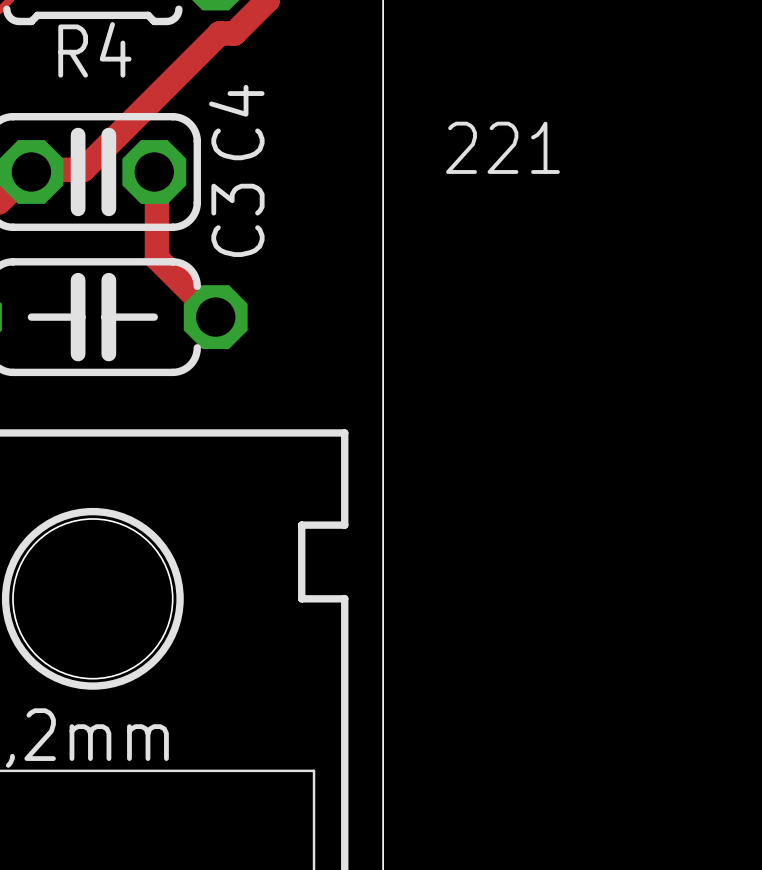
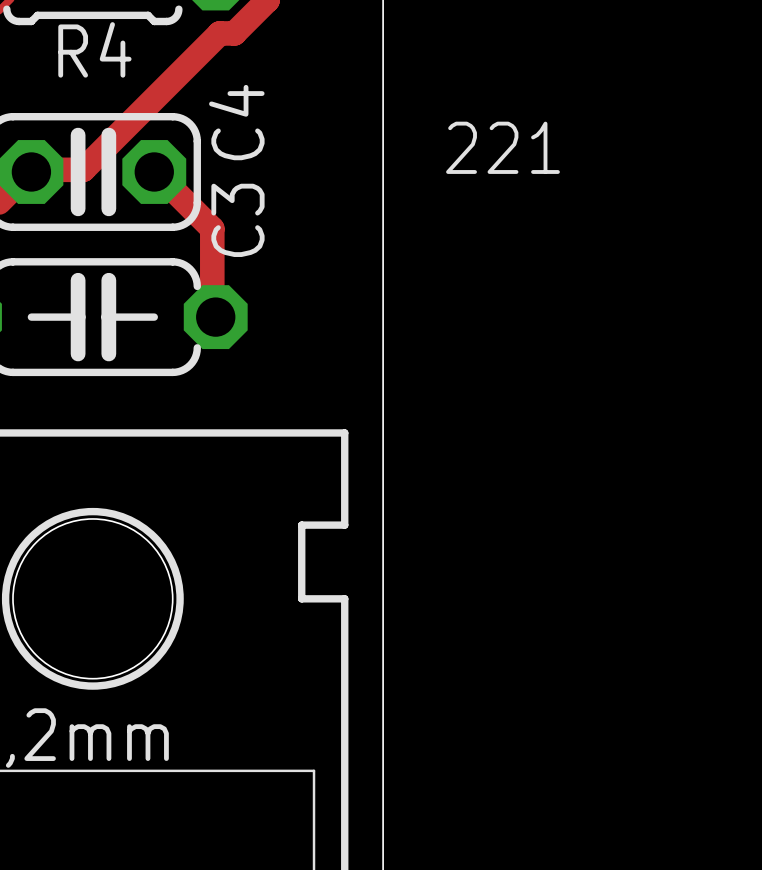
track: (157, 173) (157, 258) (212, 313) -> (157, 173) (212, 228) (212, 313)

